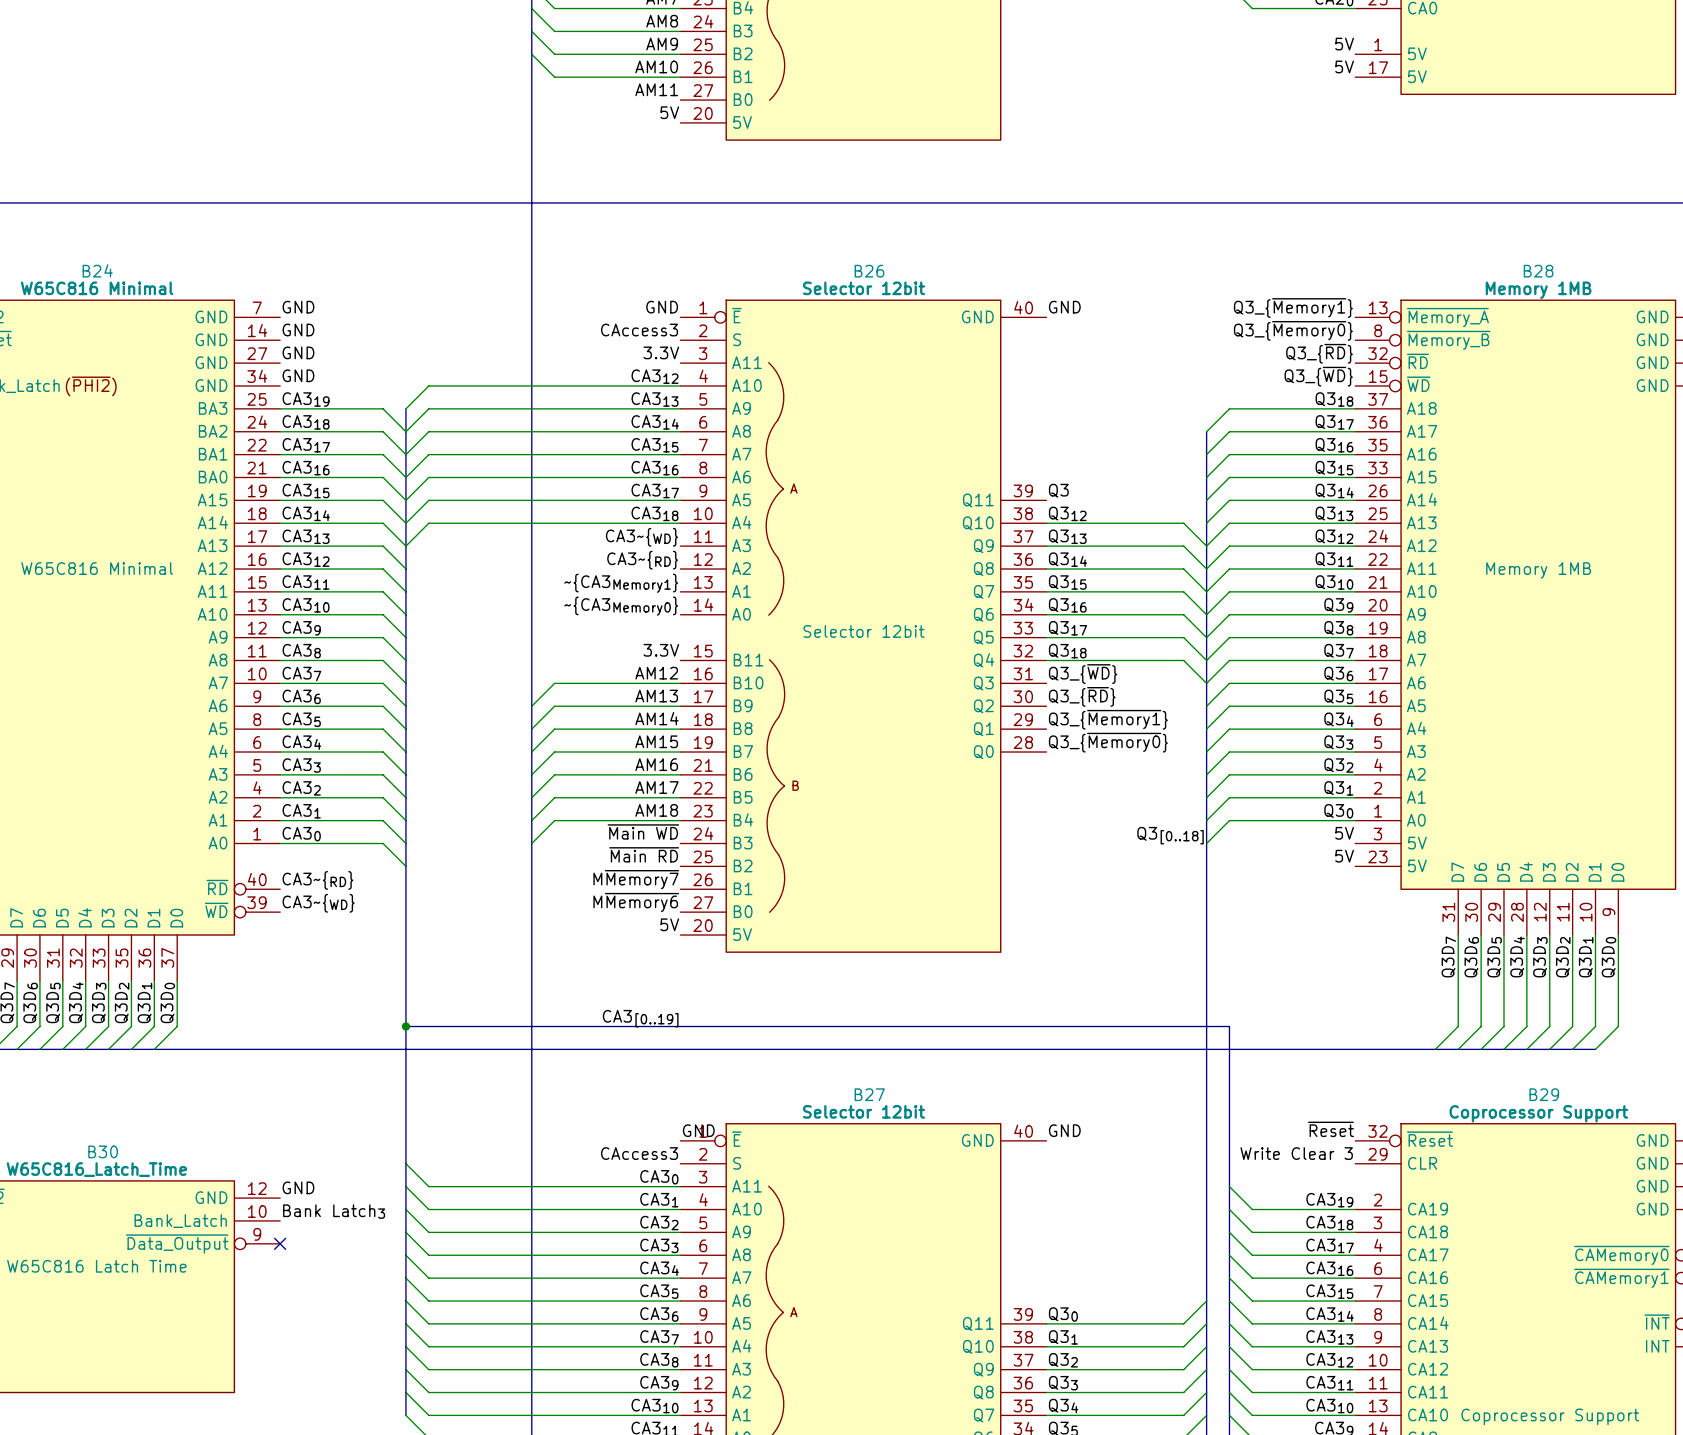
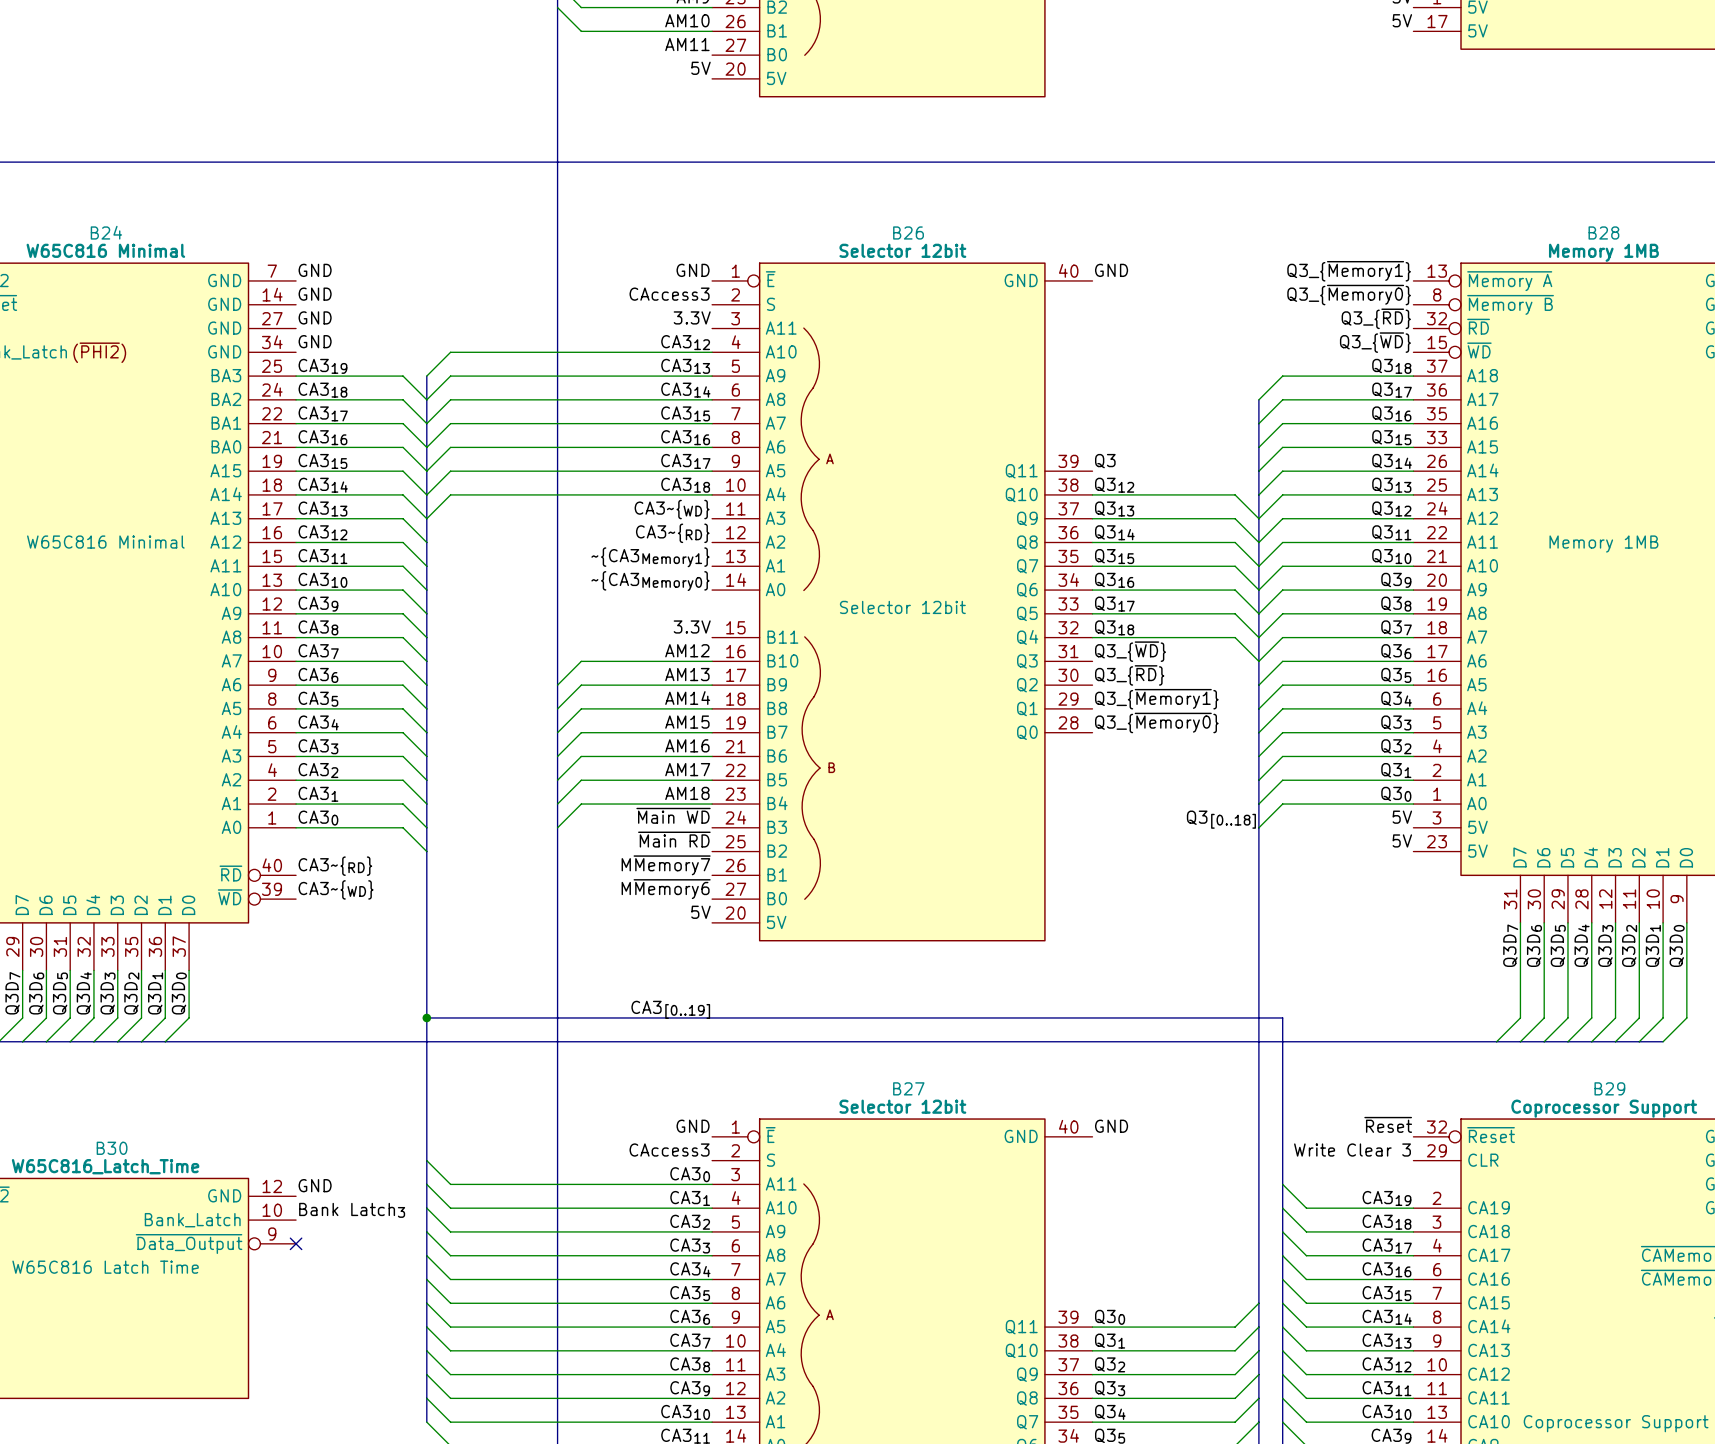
B28 pin name: ~{Memory_A} (1447, 317) -> ~{Memory A} (1509, 281)
B28 pin name: ~{Memory_B} (1448, 340) -> ~{Memory B} (1510, 304)
label position: GND (698, 1130) -> GND (693, 1126)

